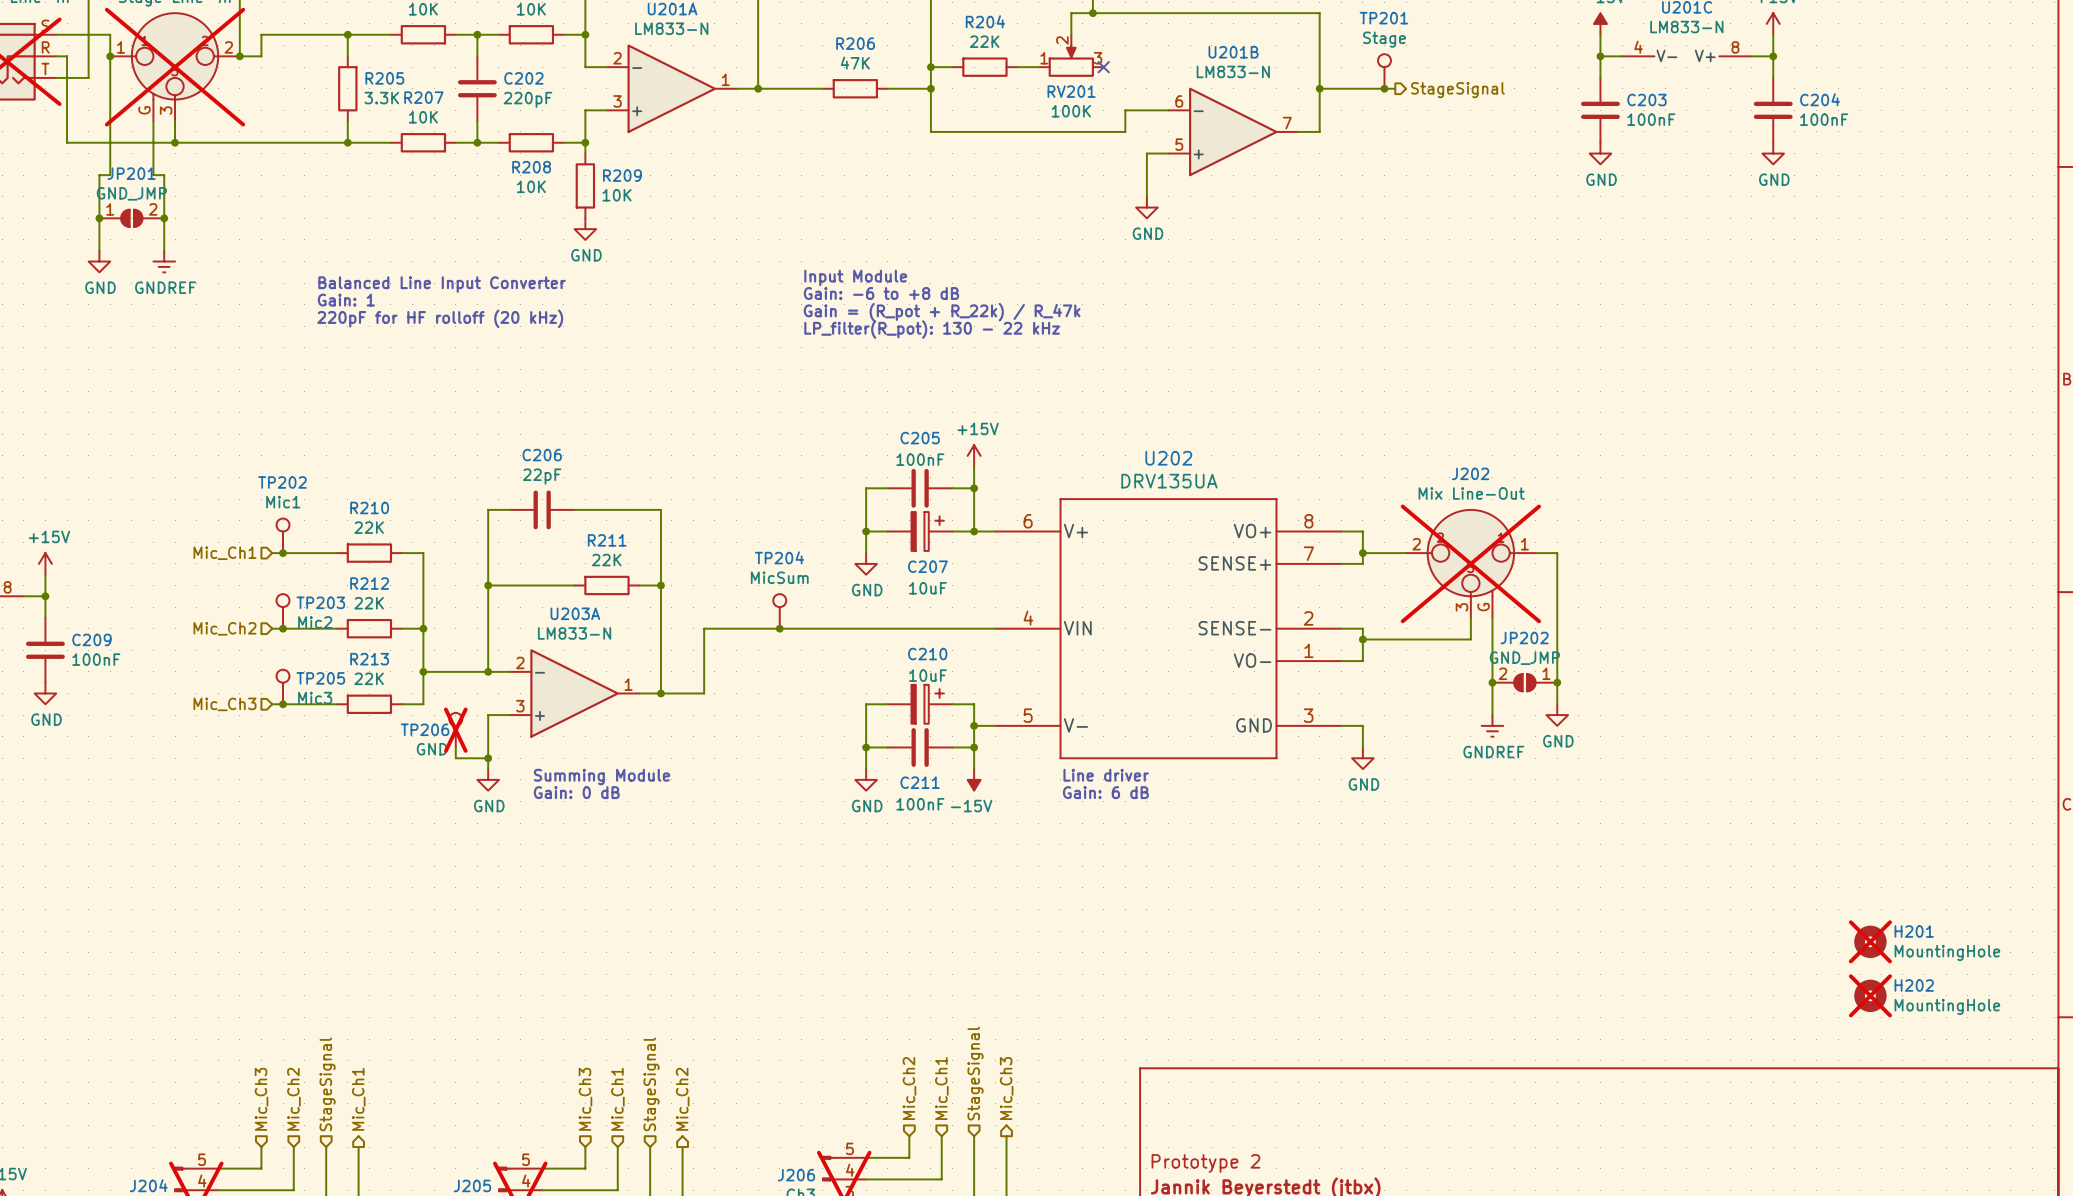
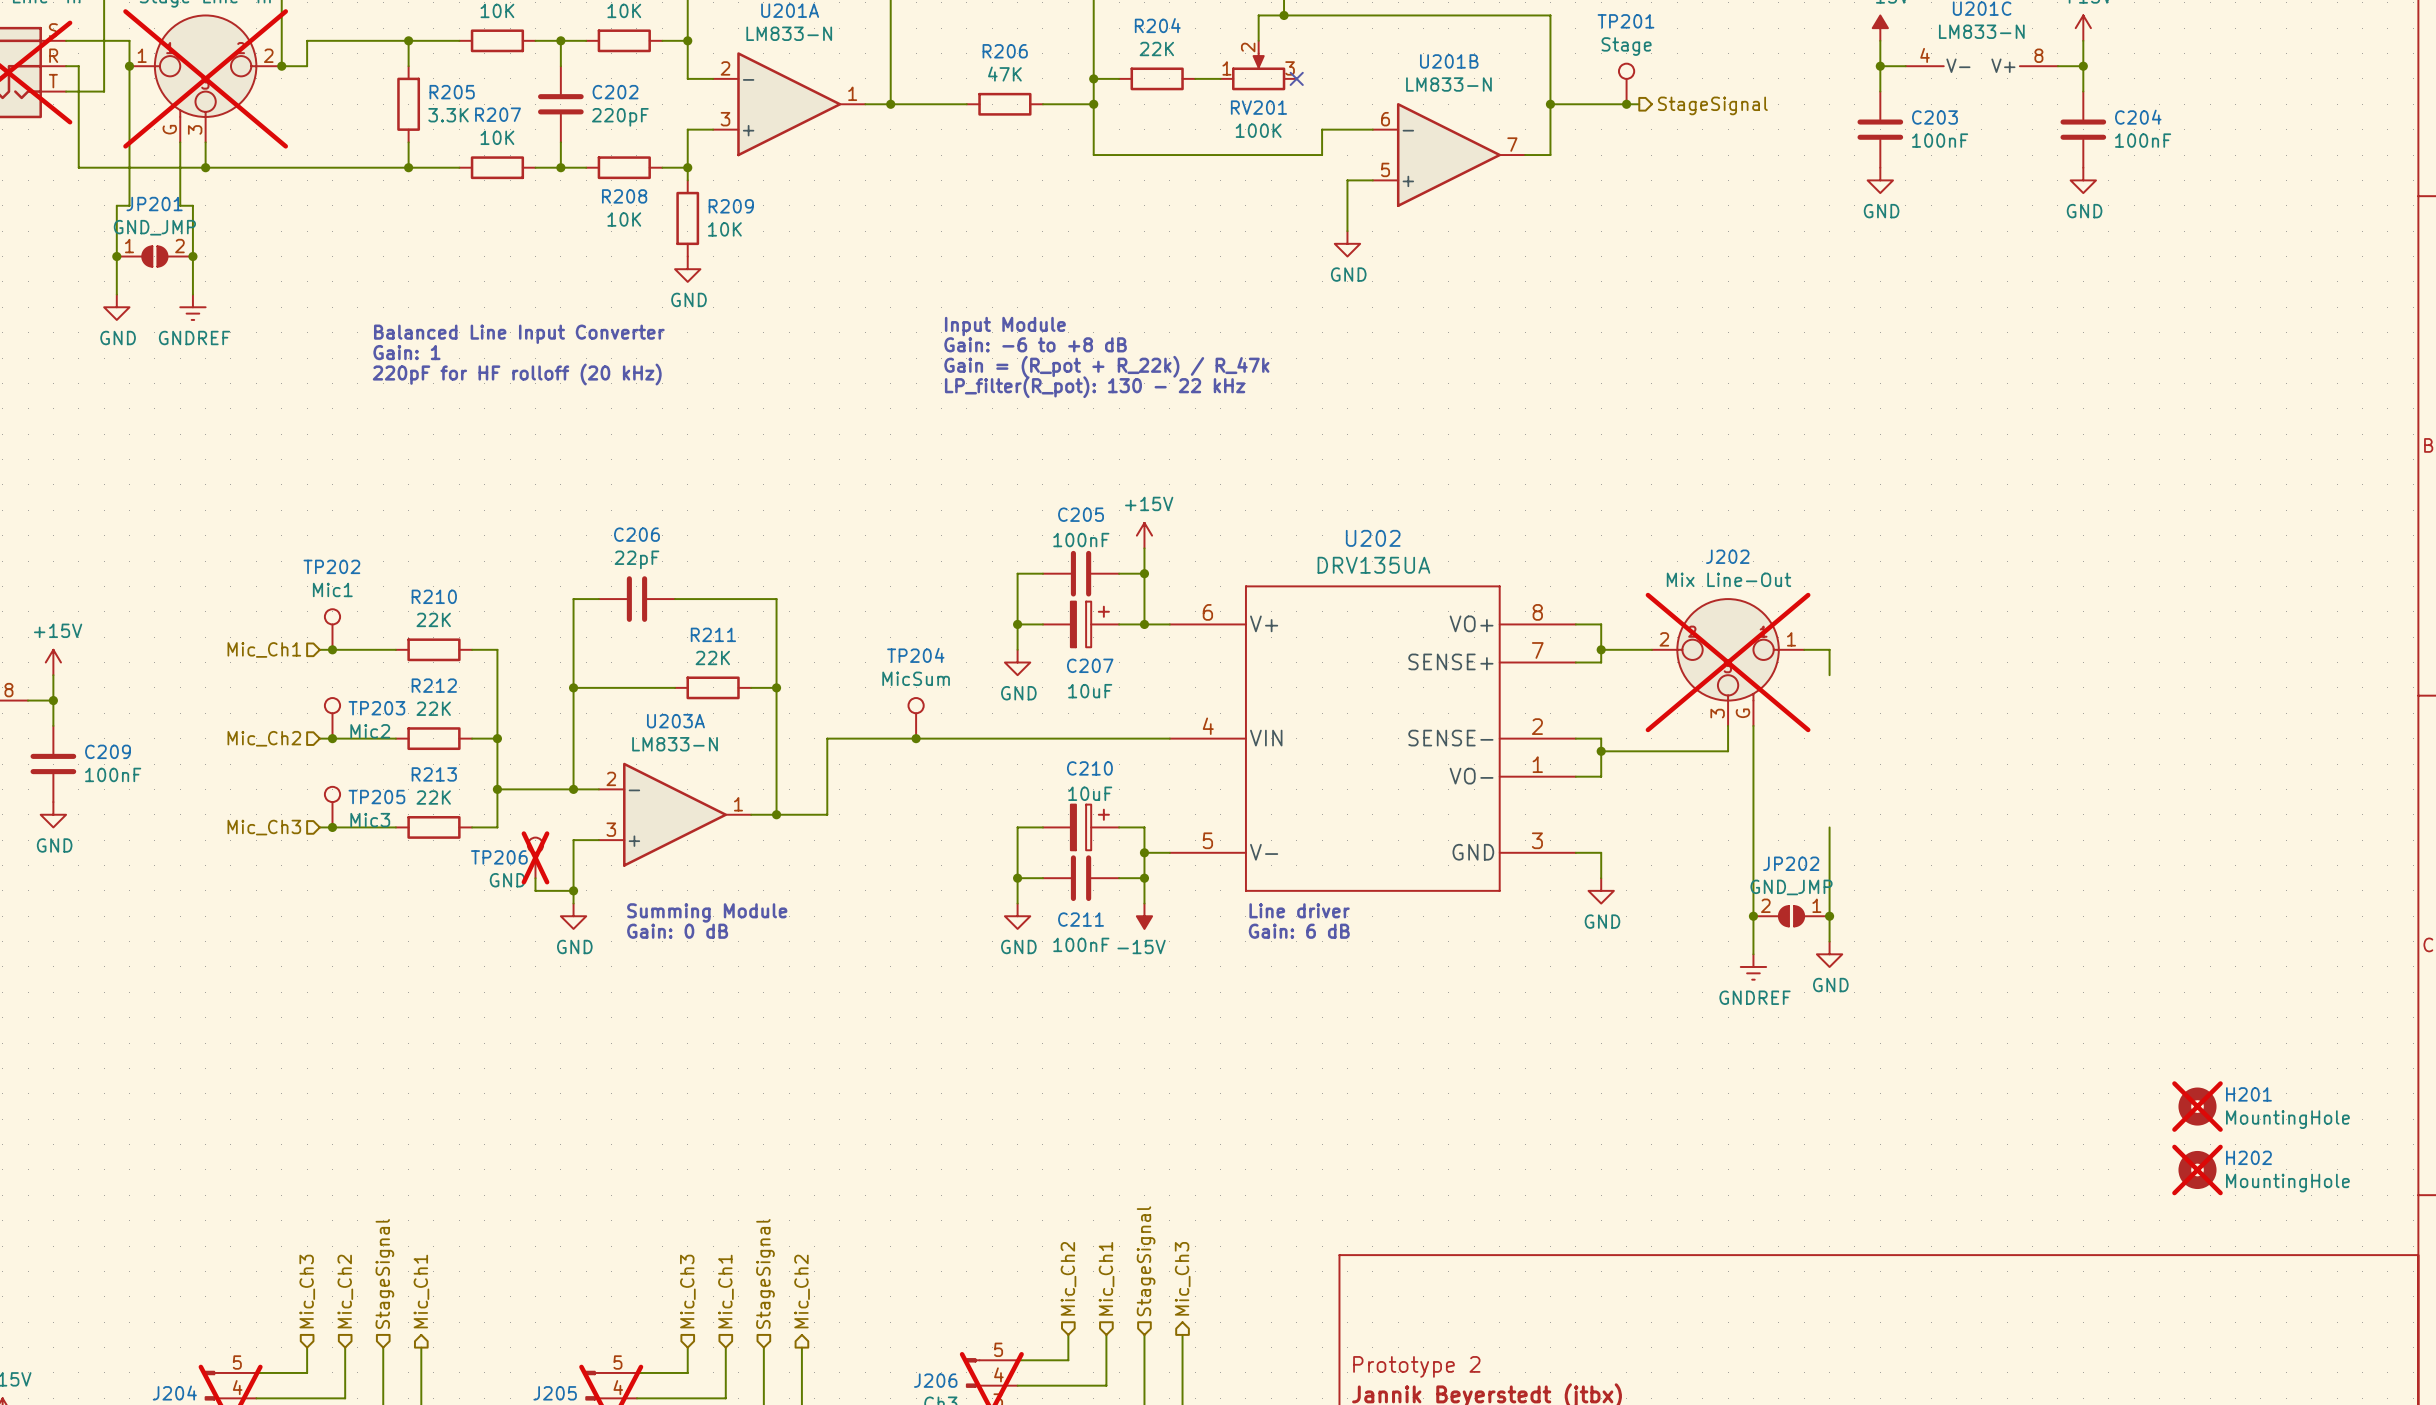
wire: (1557, 574) (1557, 704) -> (1829, 941) (1829, 827)
junction: (1492, 682) -> none
JP202 position: (1524, 682) -> (1791, 916)
junction: (1557, 682) -> none
wire: none -> (1753, 840) (1753, 954)
power symbol position: GND (1557, 715) -> GND (1829, 954)
power symbol position: GNDREF (1492, 725) -> GNDREF (1753, 966)
junction: none -> (1753, 916)
junction: none -> (1829, 916)

